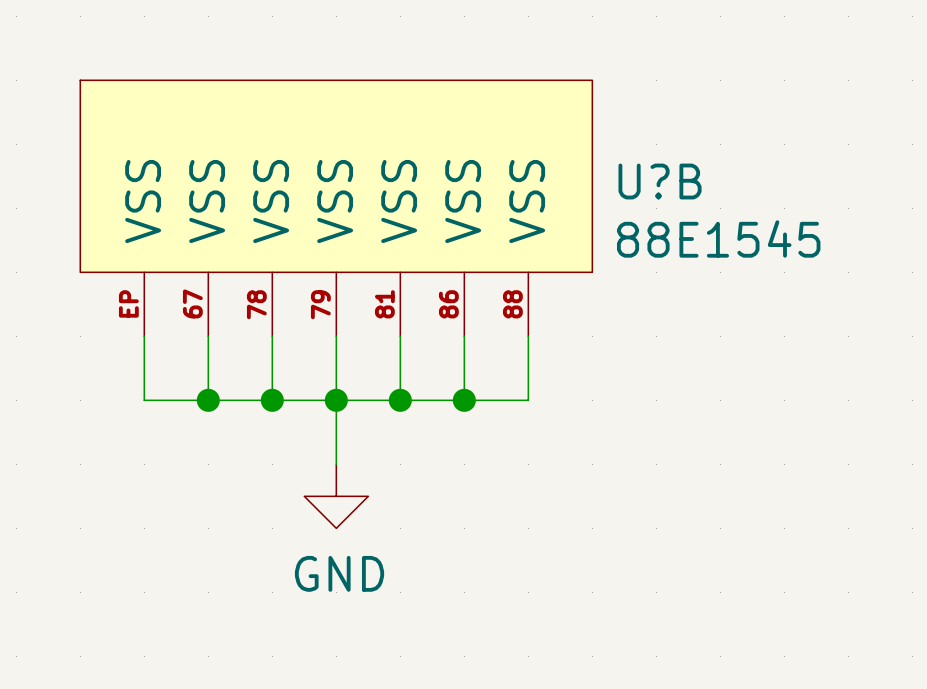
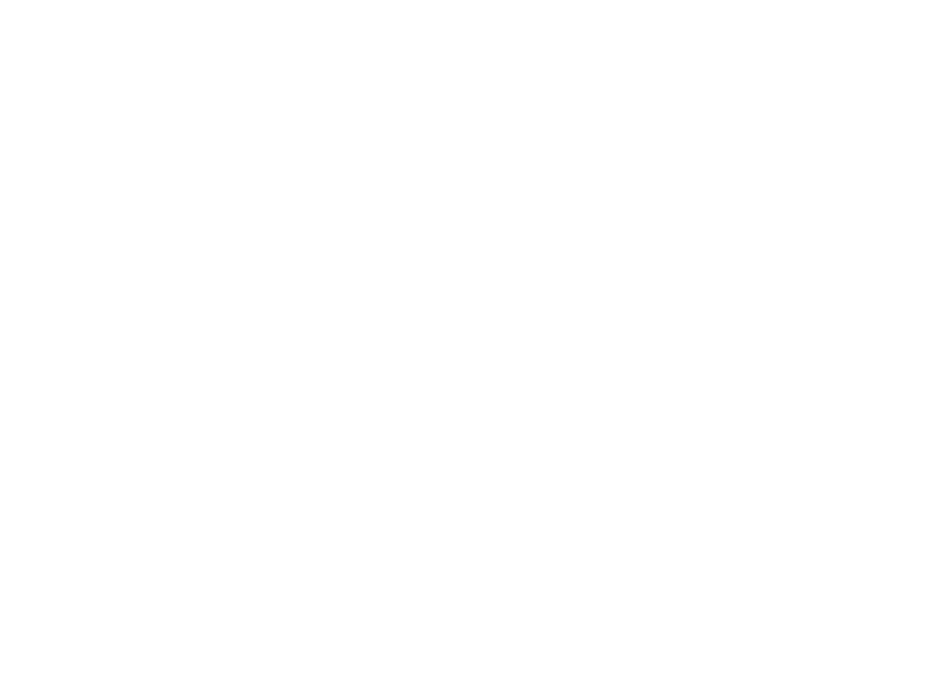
U?B: 88E1545 (336, 208) -> none
wire: (144, 336) (144, 400) (528, 400) (528, 336) -> none
wire: (208, 336) (208, 400) -> none
wire: (272, 336) (272, 400) -> none
wire: (336, 336) (336, 464) -> none
wire: (400, 336) (400, 400) -> none
wire: (464, 336) (464, 400) -> none
junction: (208, 400) -> none
junction: (272, 400) -> none
junction: (336, 400) -> none
junction: (400, 400) -> none
junction: (464, 400) -> none
power symbol: GND (336, 496) -> none

